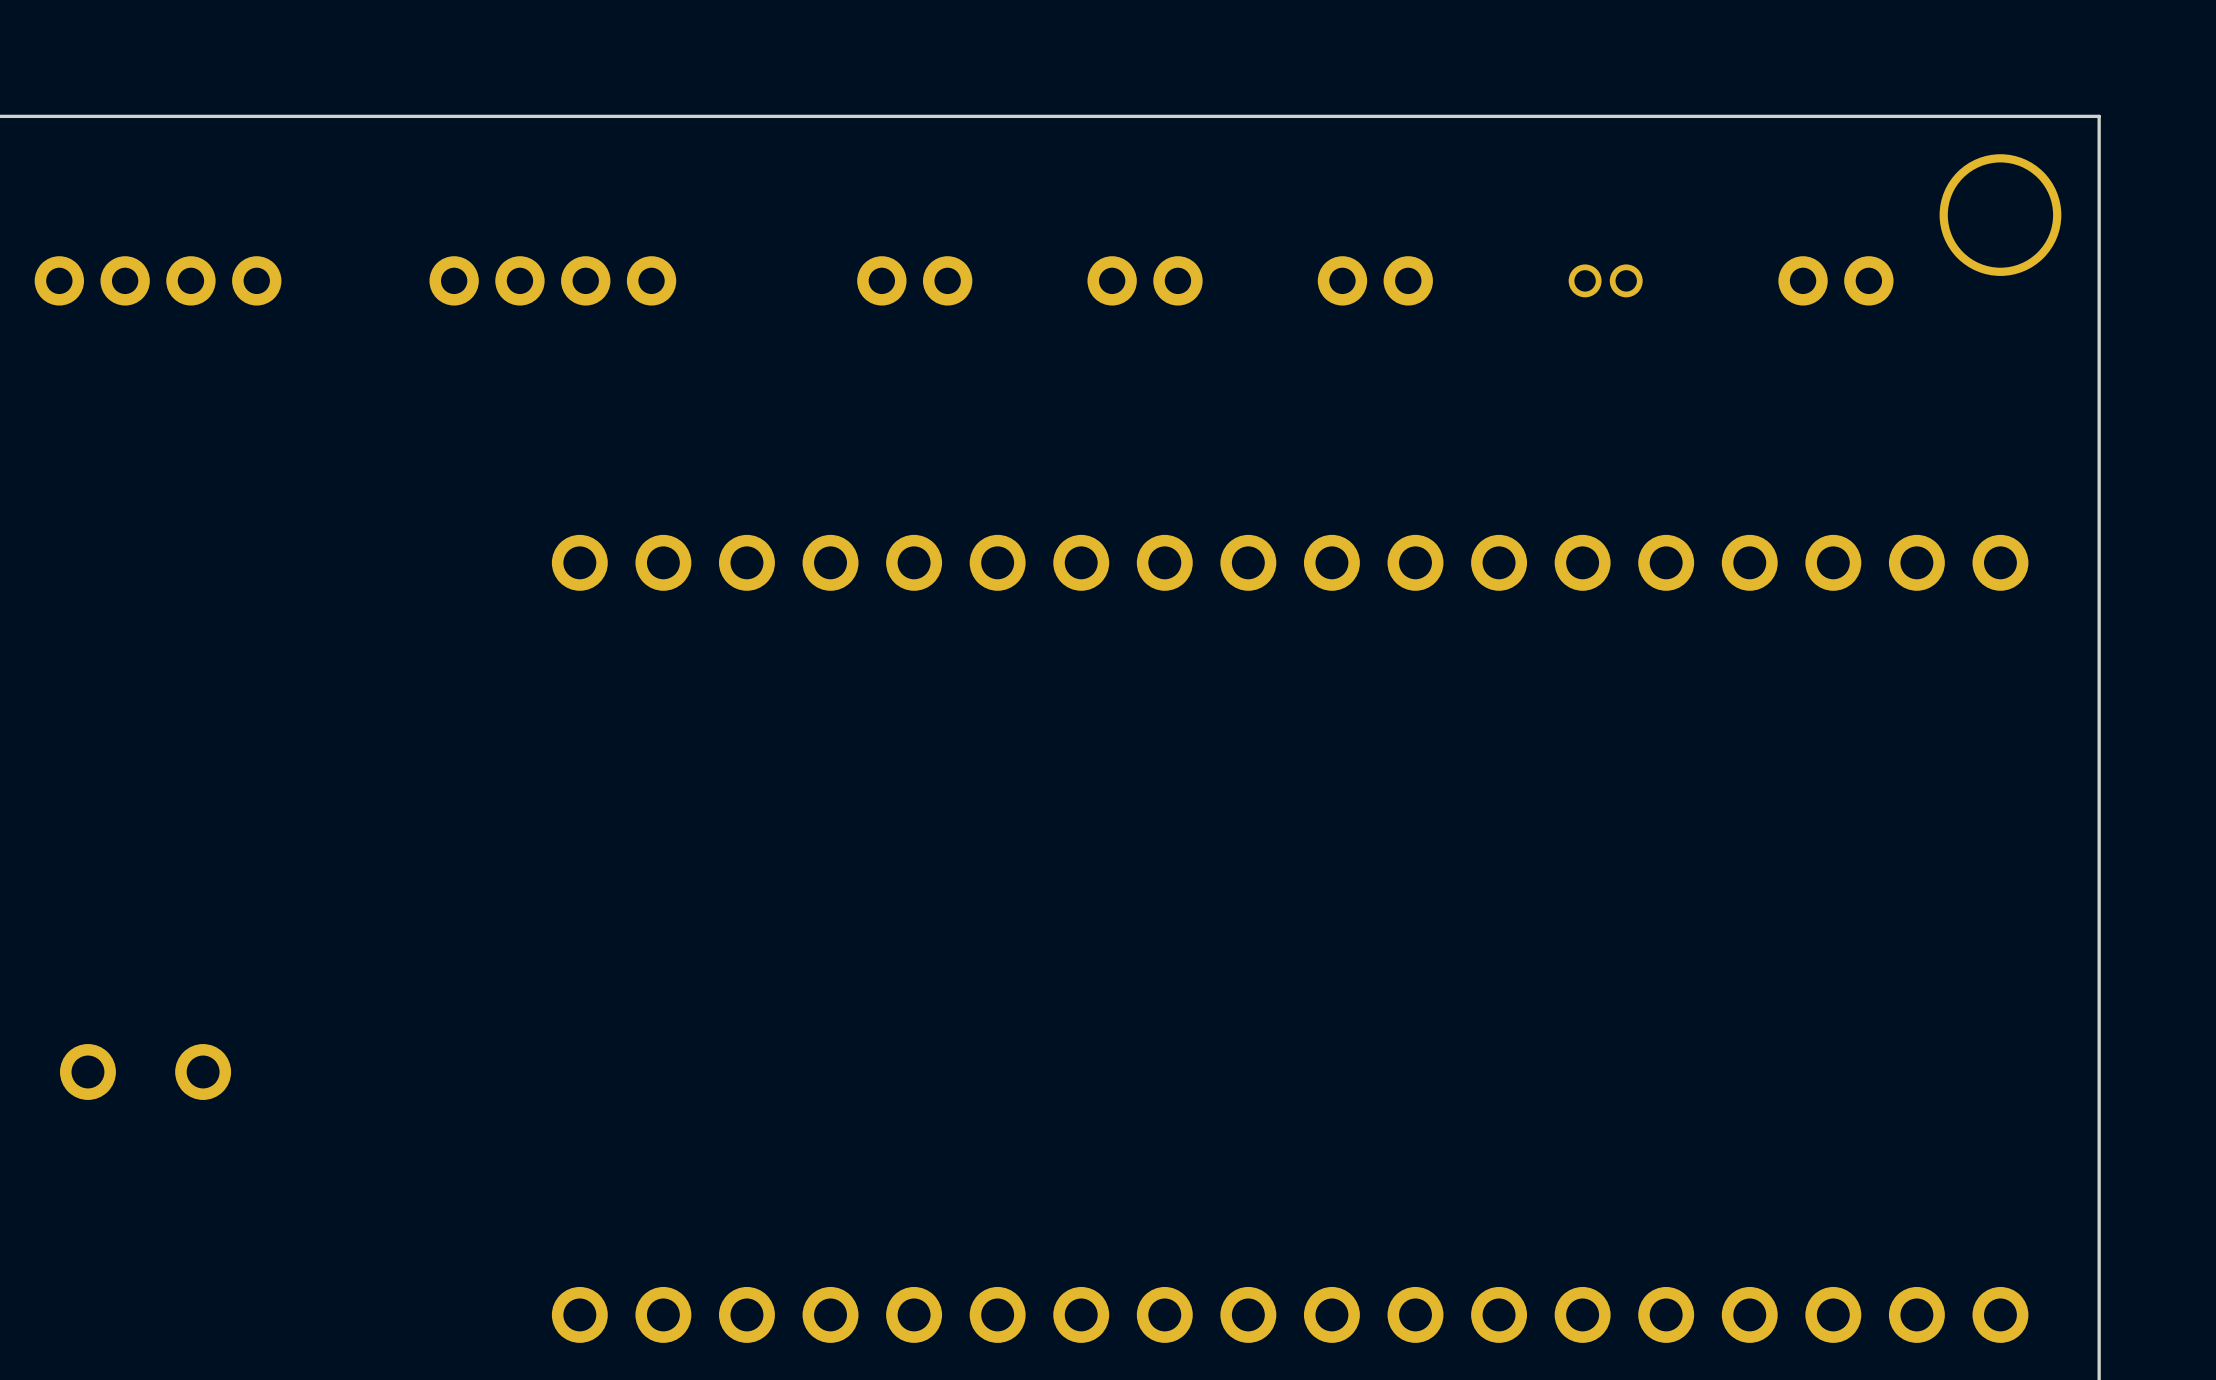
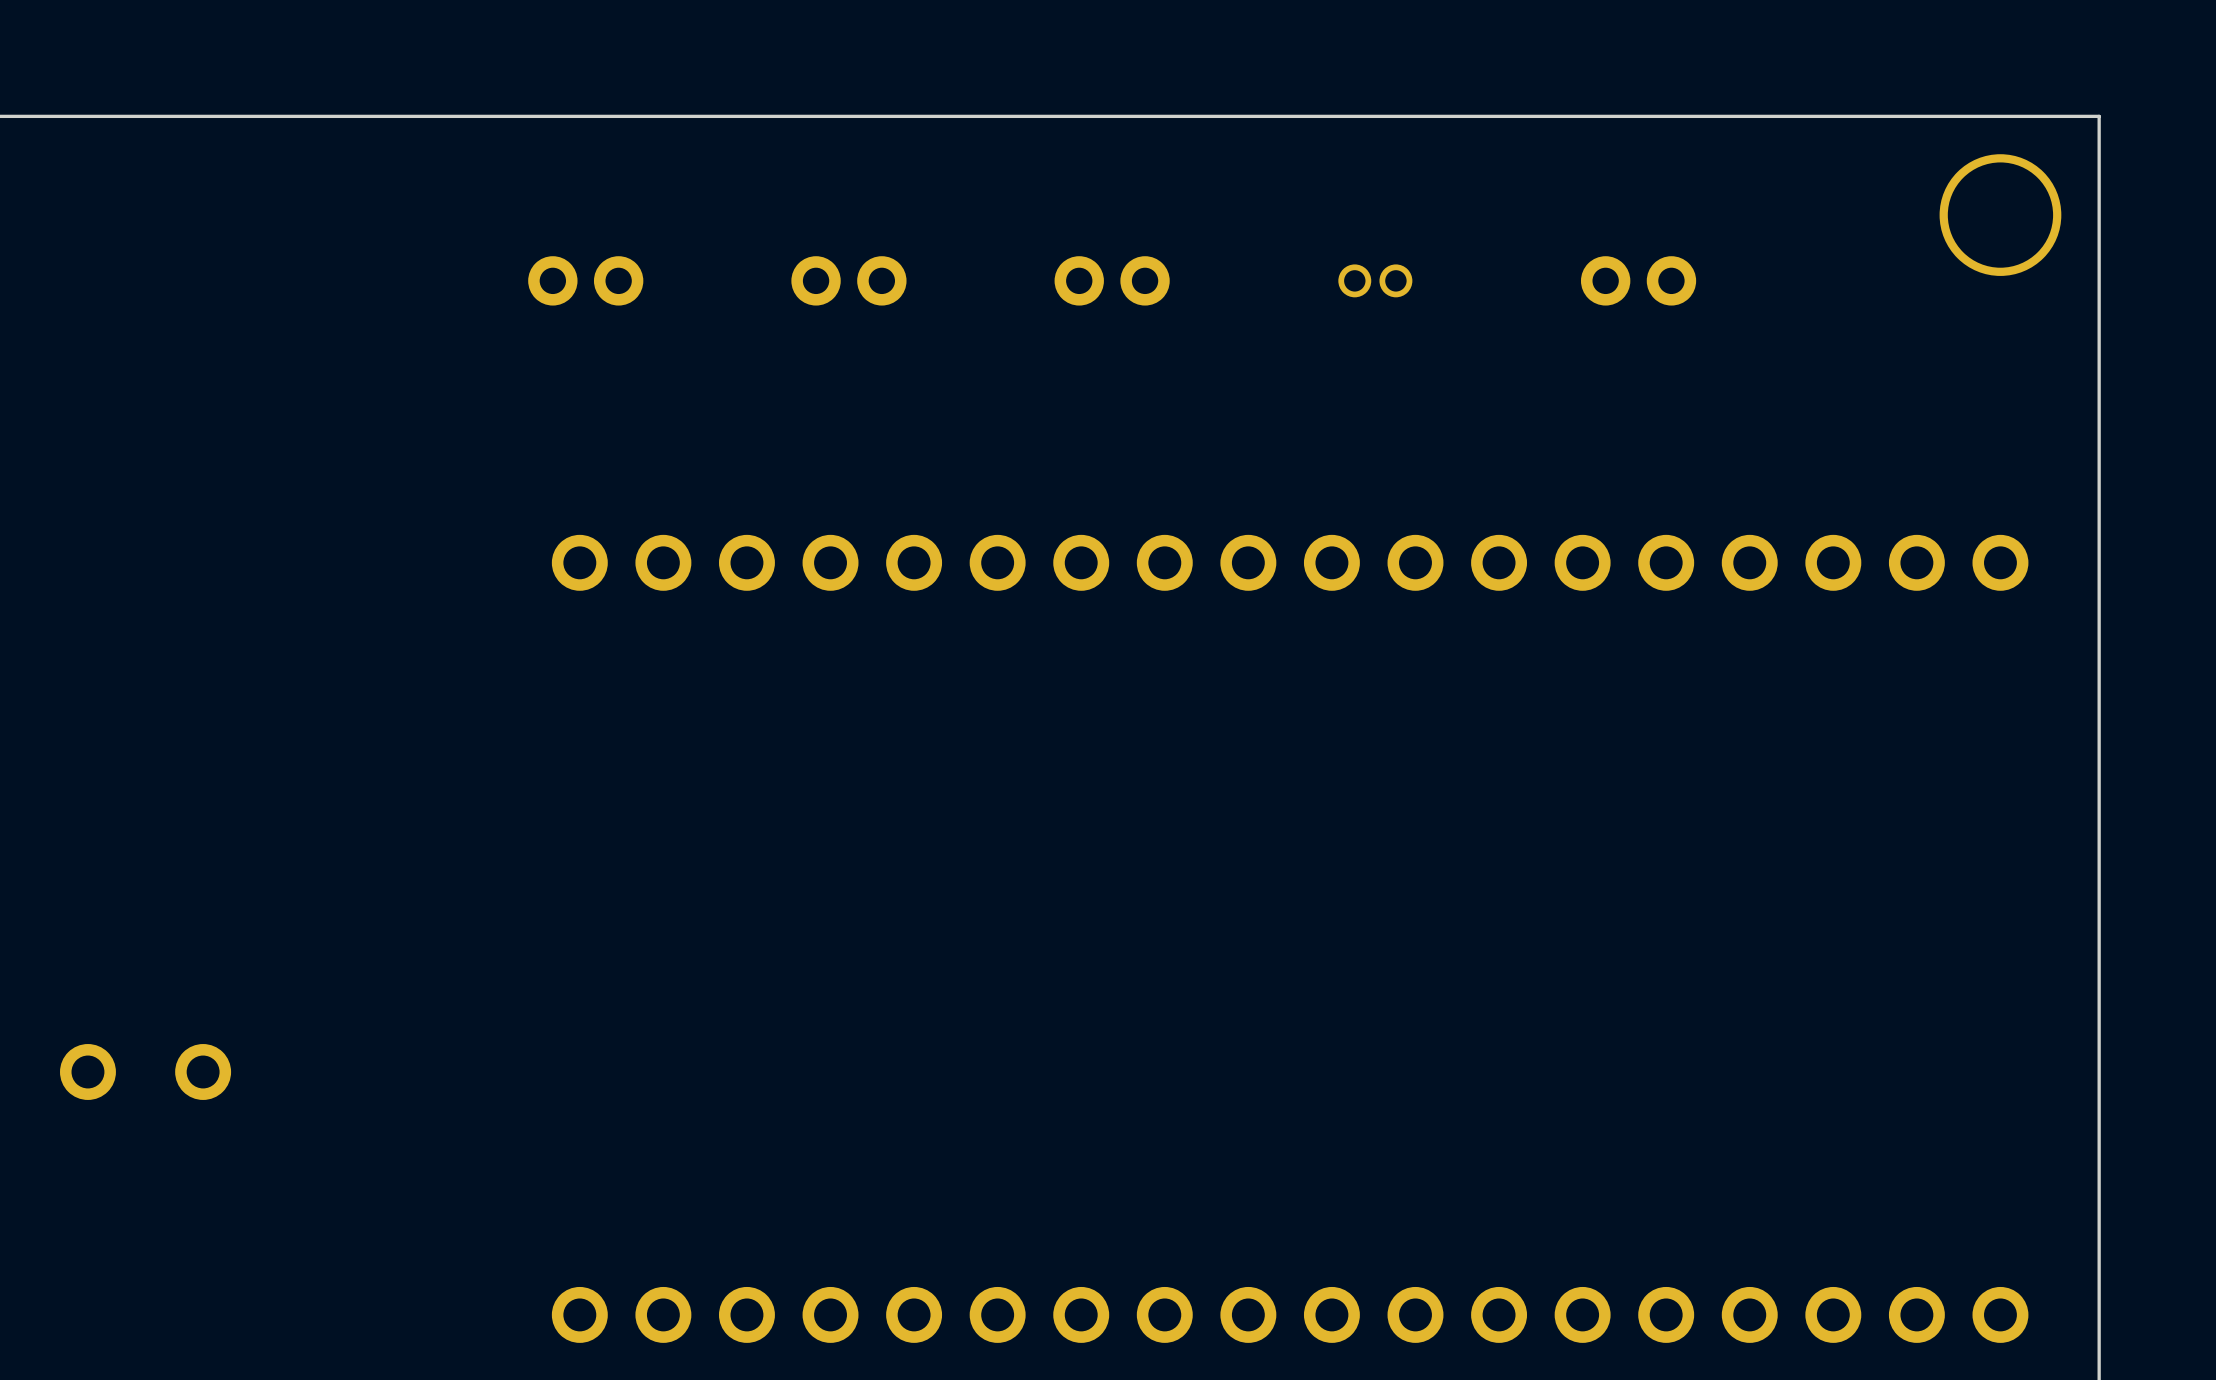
part footprint: [429, 256, 677, 306] -> [528, 256, 644, 306]
part footprint: [1317, 256, 1433, 306] -> [1338, 264, 1413, 298]
part footprint: [1568, 264, 1643, 298] -> [1580, 256, 1697, 306]
part: (158, 280) -> none
part position: (914, 280) -> (848, 280)
part position: (1145, 280) -> (1112, 280)
part: (1835, 280) -> none

